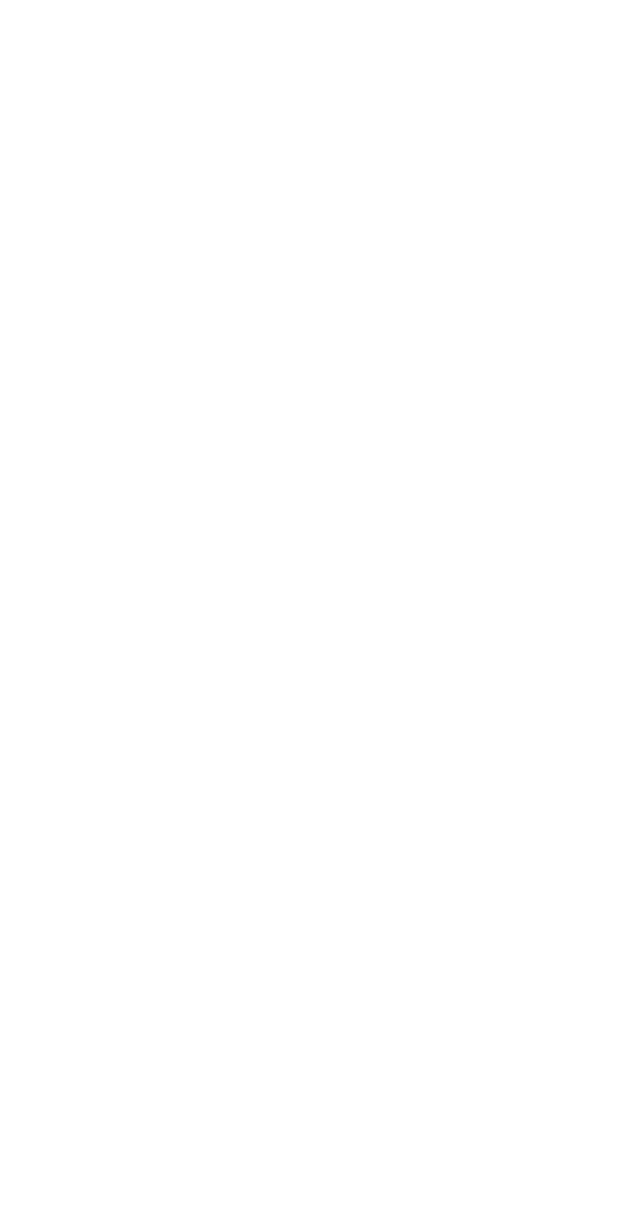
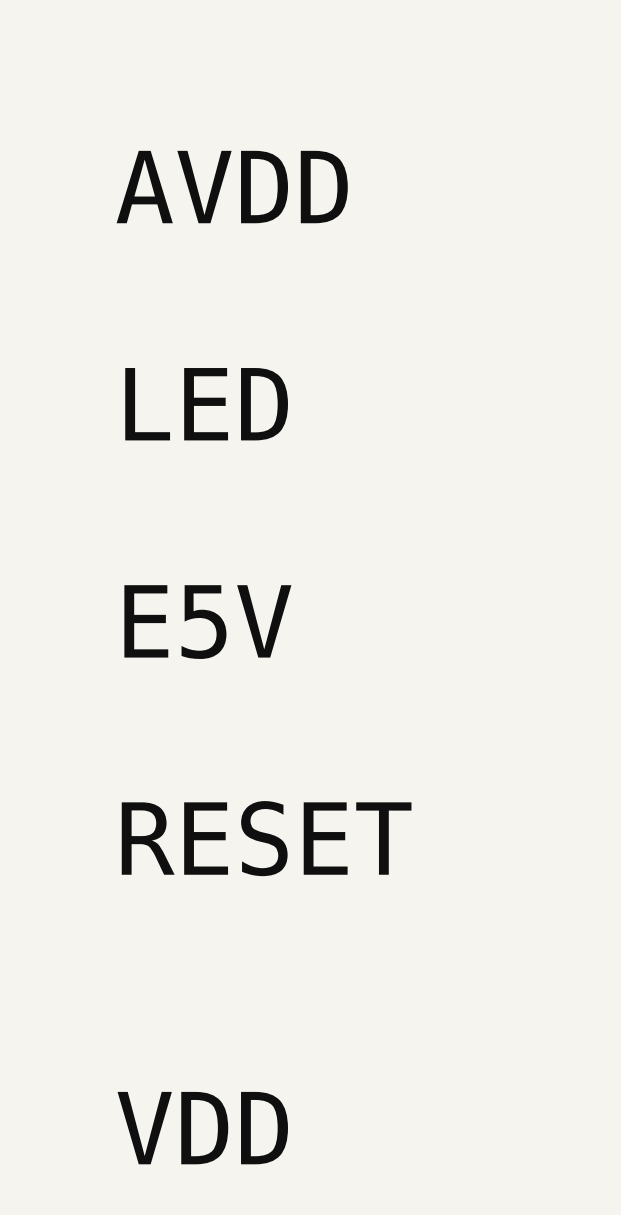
label: none -> AVDD (232, 187)
label: none -> LED (206, 404)
label: none -> E5V (207, 622)
label: none -> RESET (266, 838)
label: none -> VDD (202, 1128)

